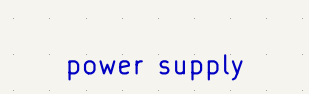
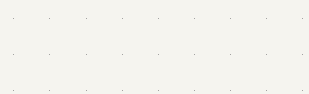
text: power supply (155, 67) -> none

